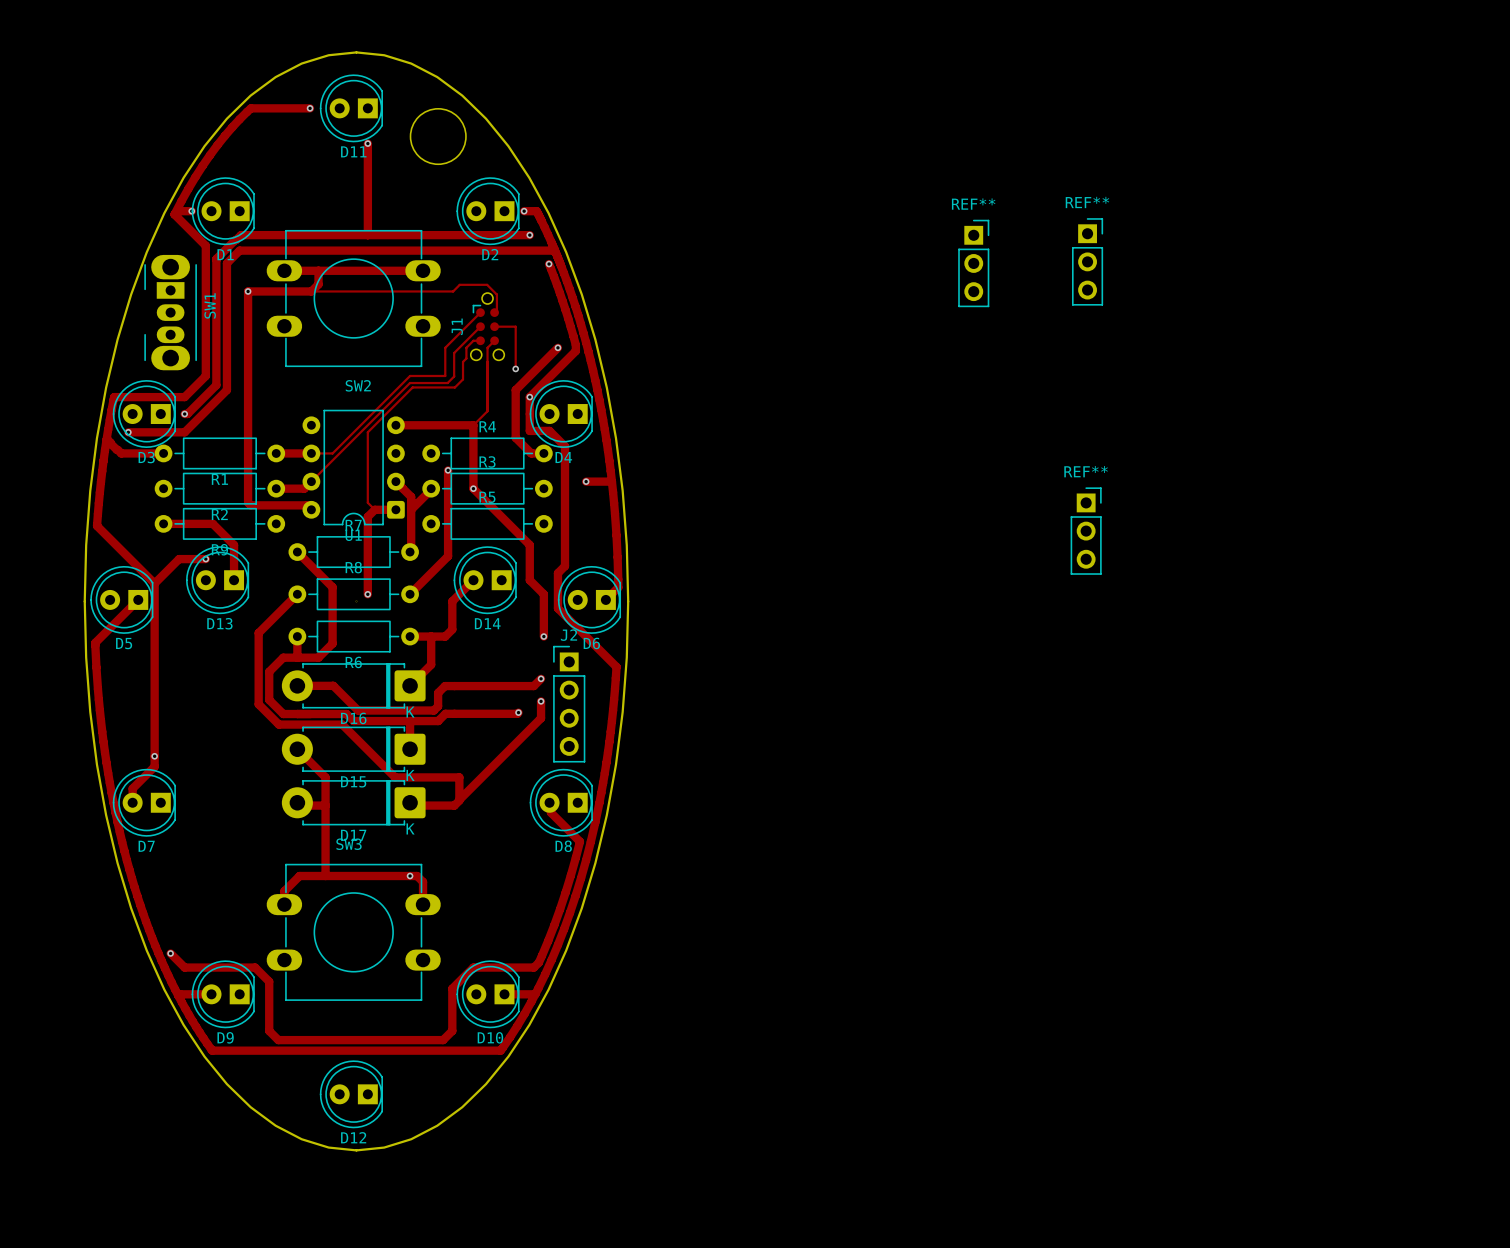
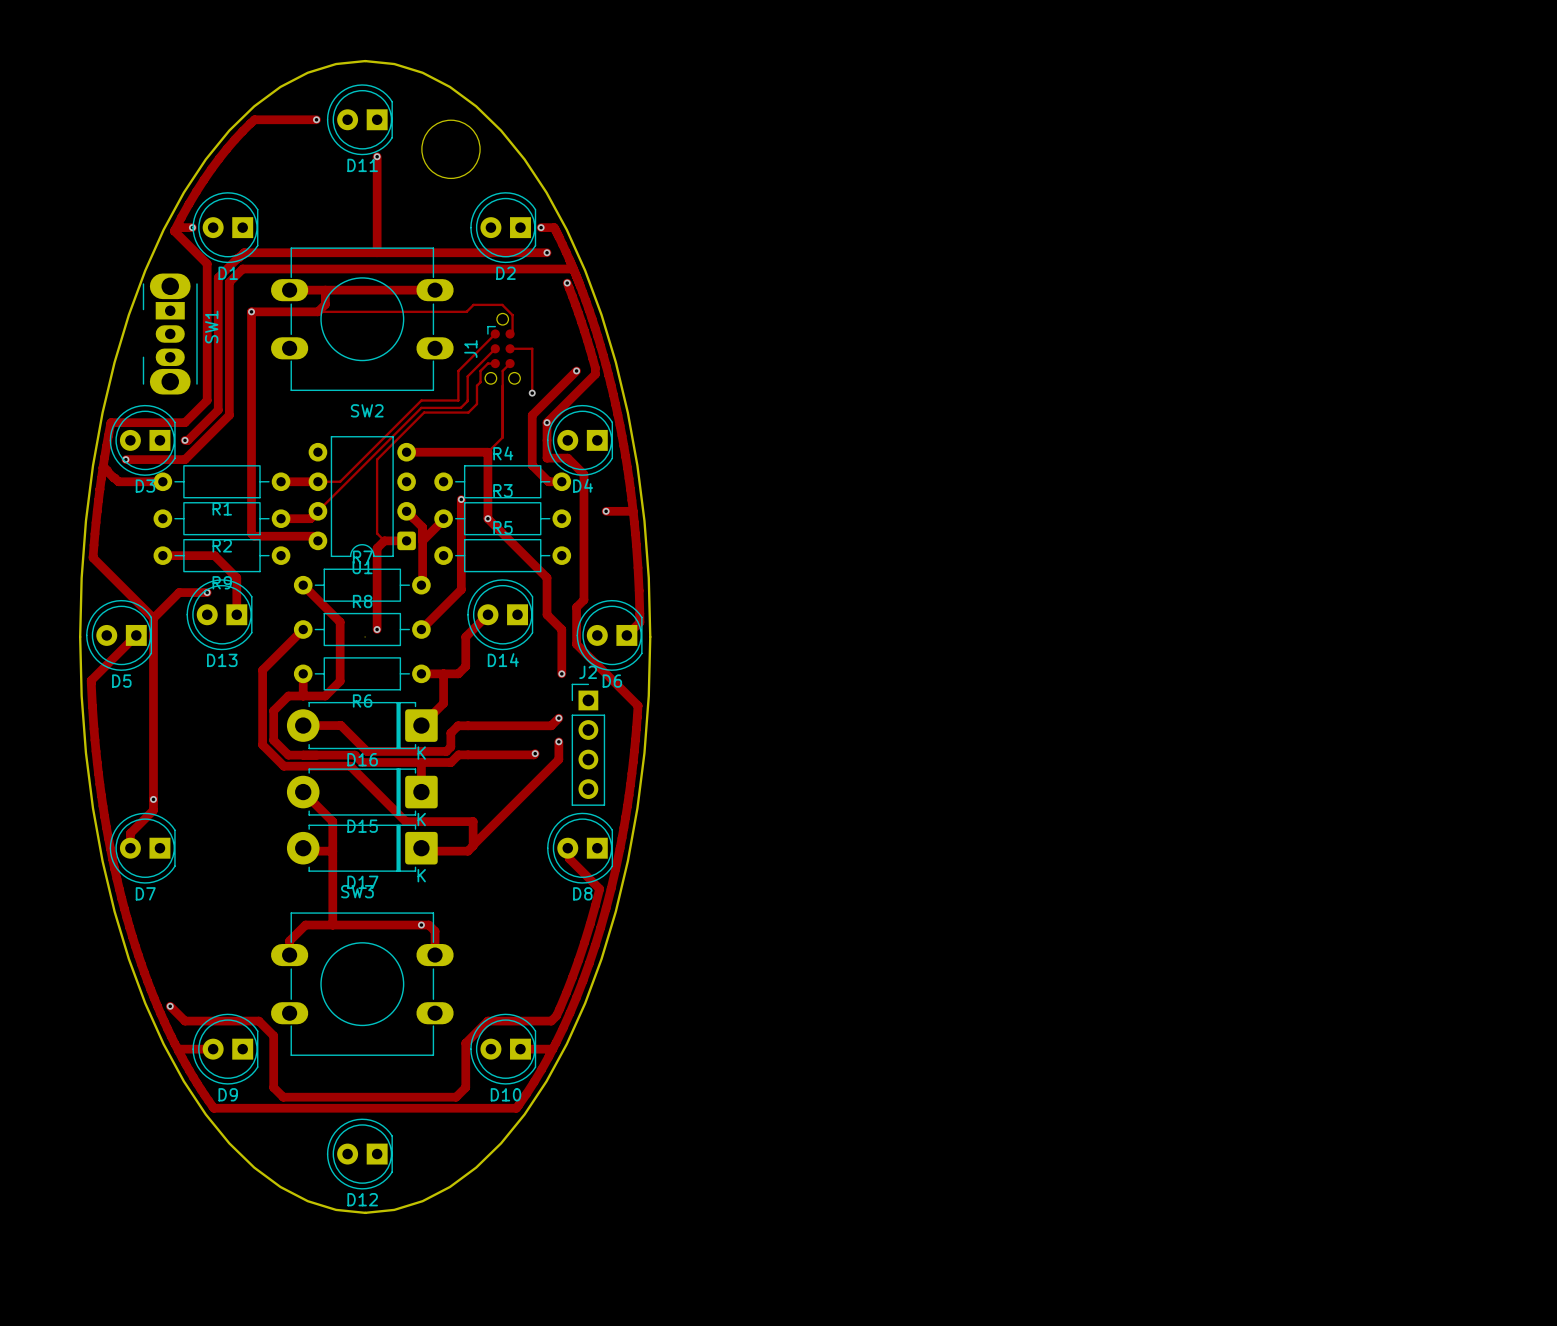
REF**: (1087, 261) -> none
REF**: (973, 263) -> none
REF**: (1086, 531) -> none

